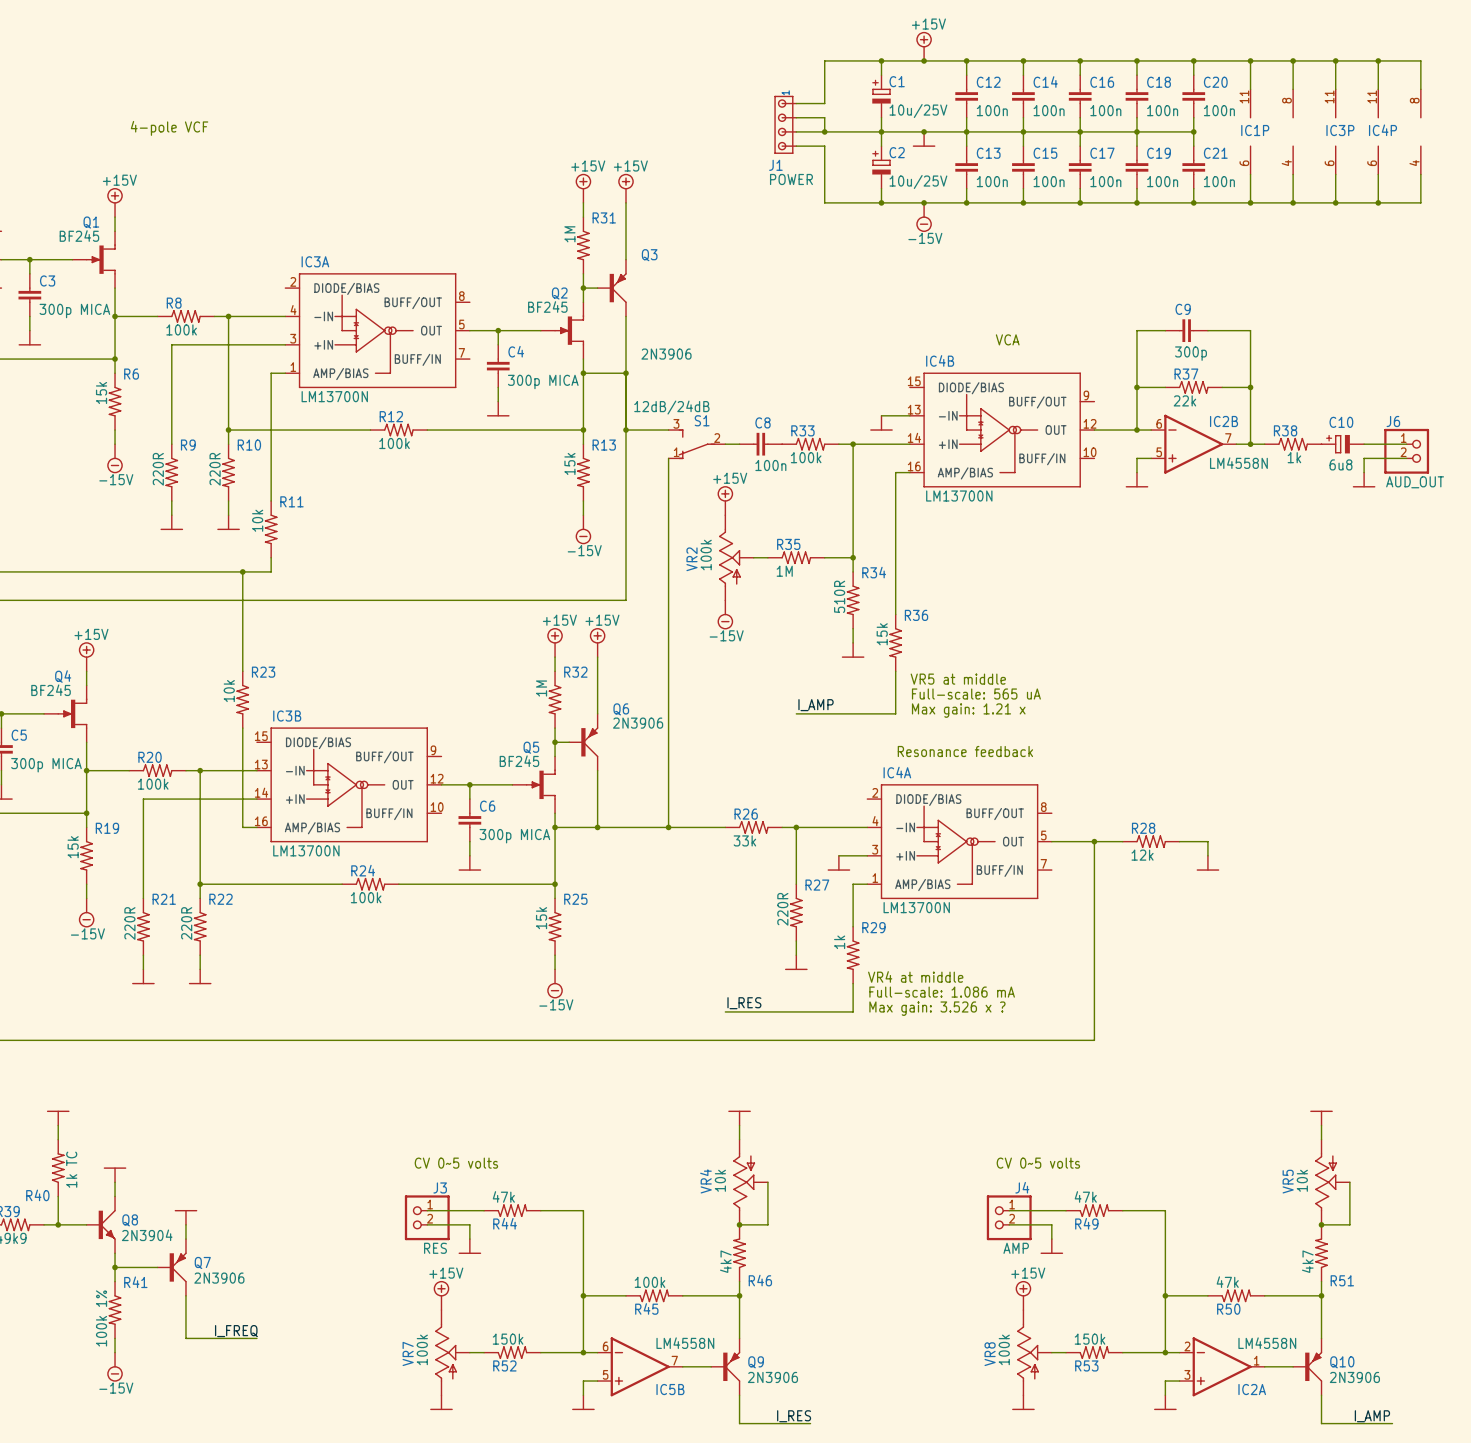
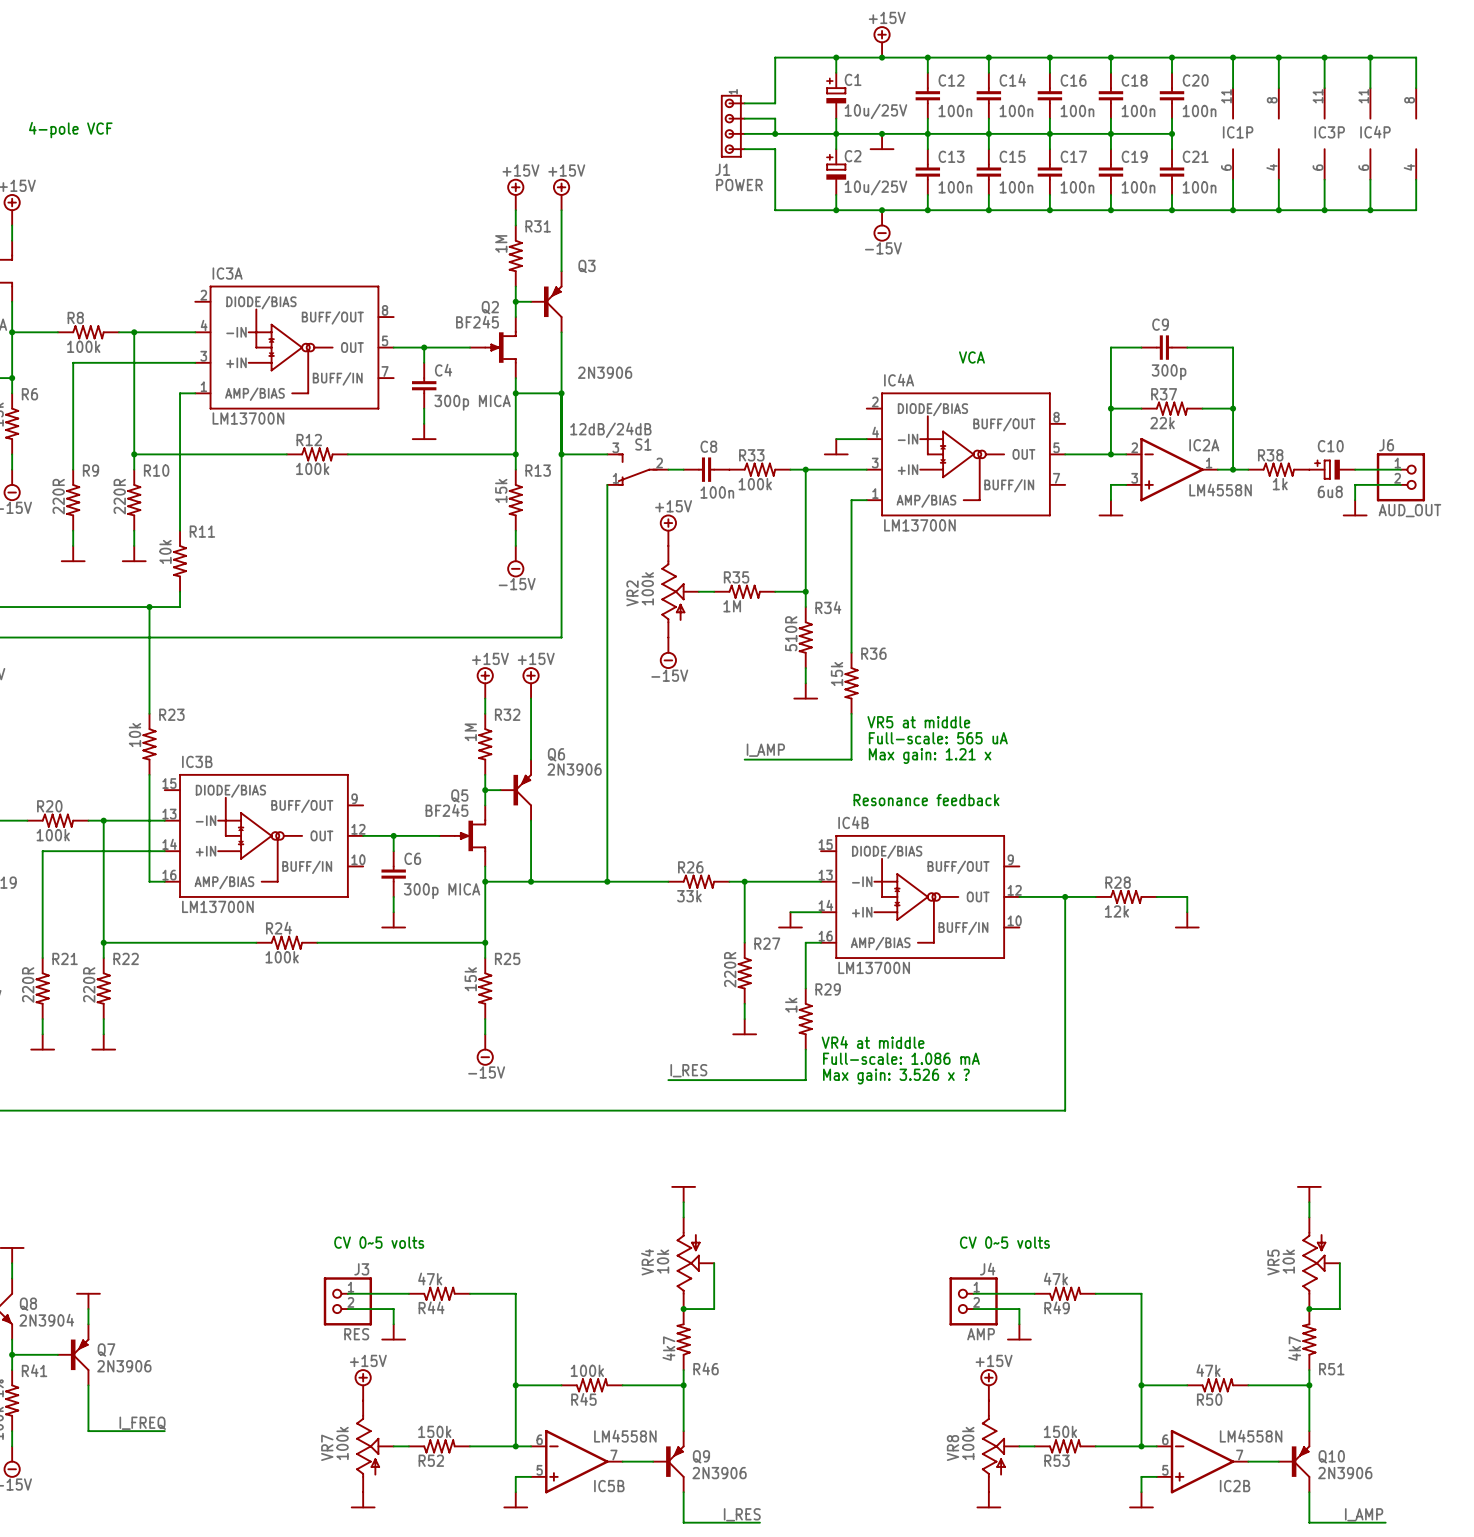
IC2B name position: IC2B (1224, 421) -> IC2B (1235, 1486)
IC4B position: (1002, 430) -> (920, 896)
IC2B position: (1193, 444) -> (1202, 1461)
IC4A position: (959, 841) -> (965, 454)
IC2A position: (1222, 1366) -> (1172, 469)
IC2A name position: IC2A (1252, 1389) -> IC2A (1204, 445)

